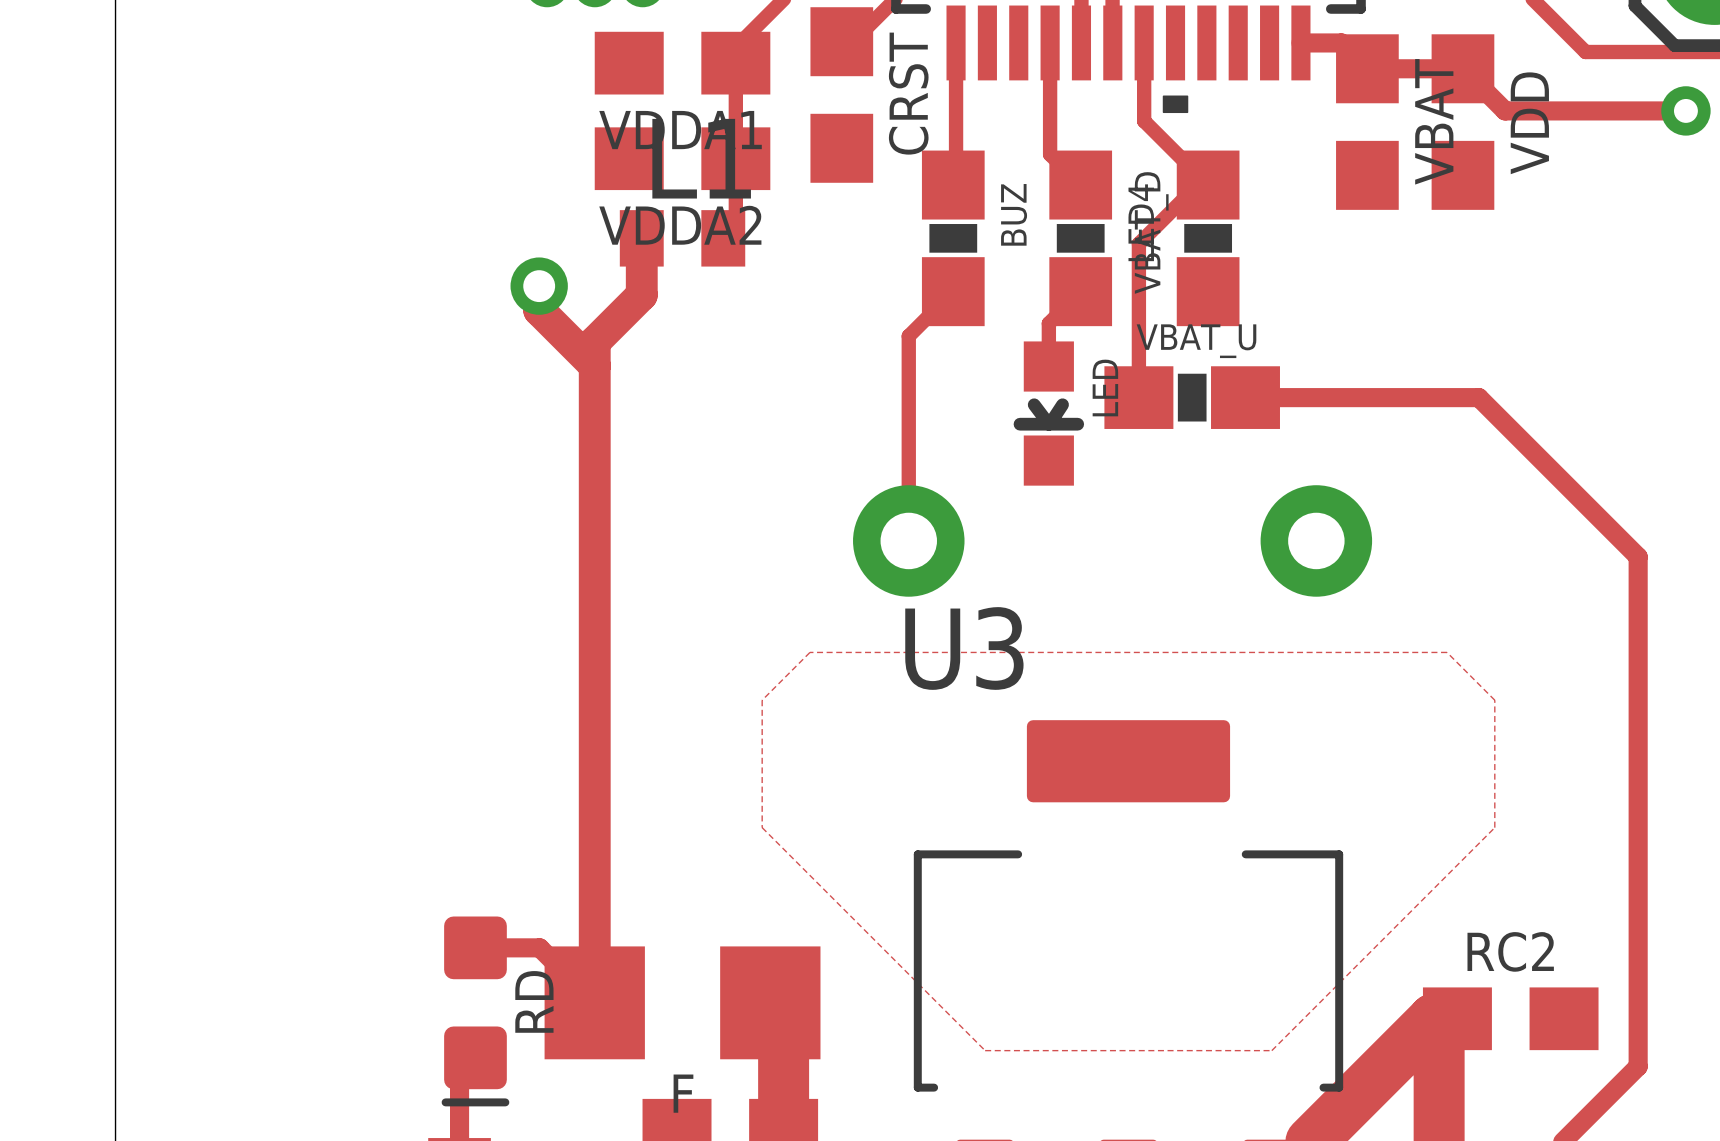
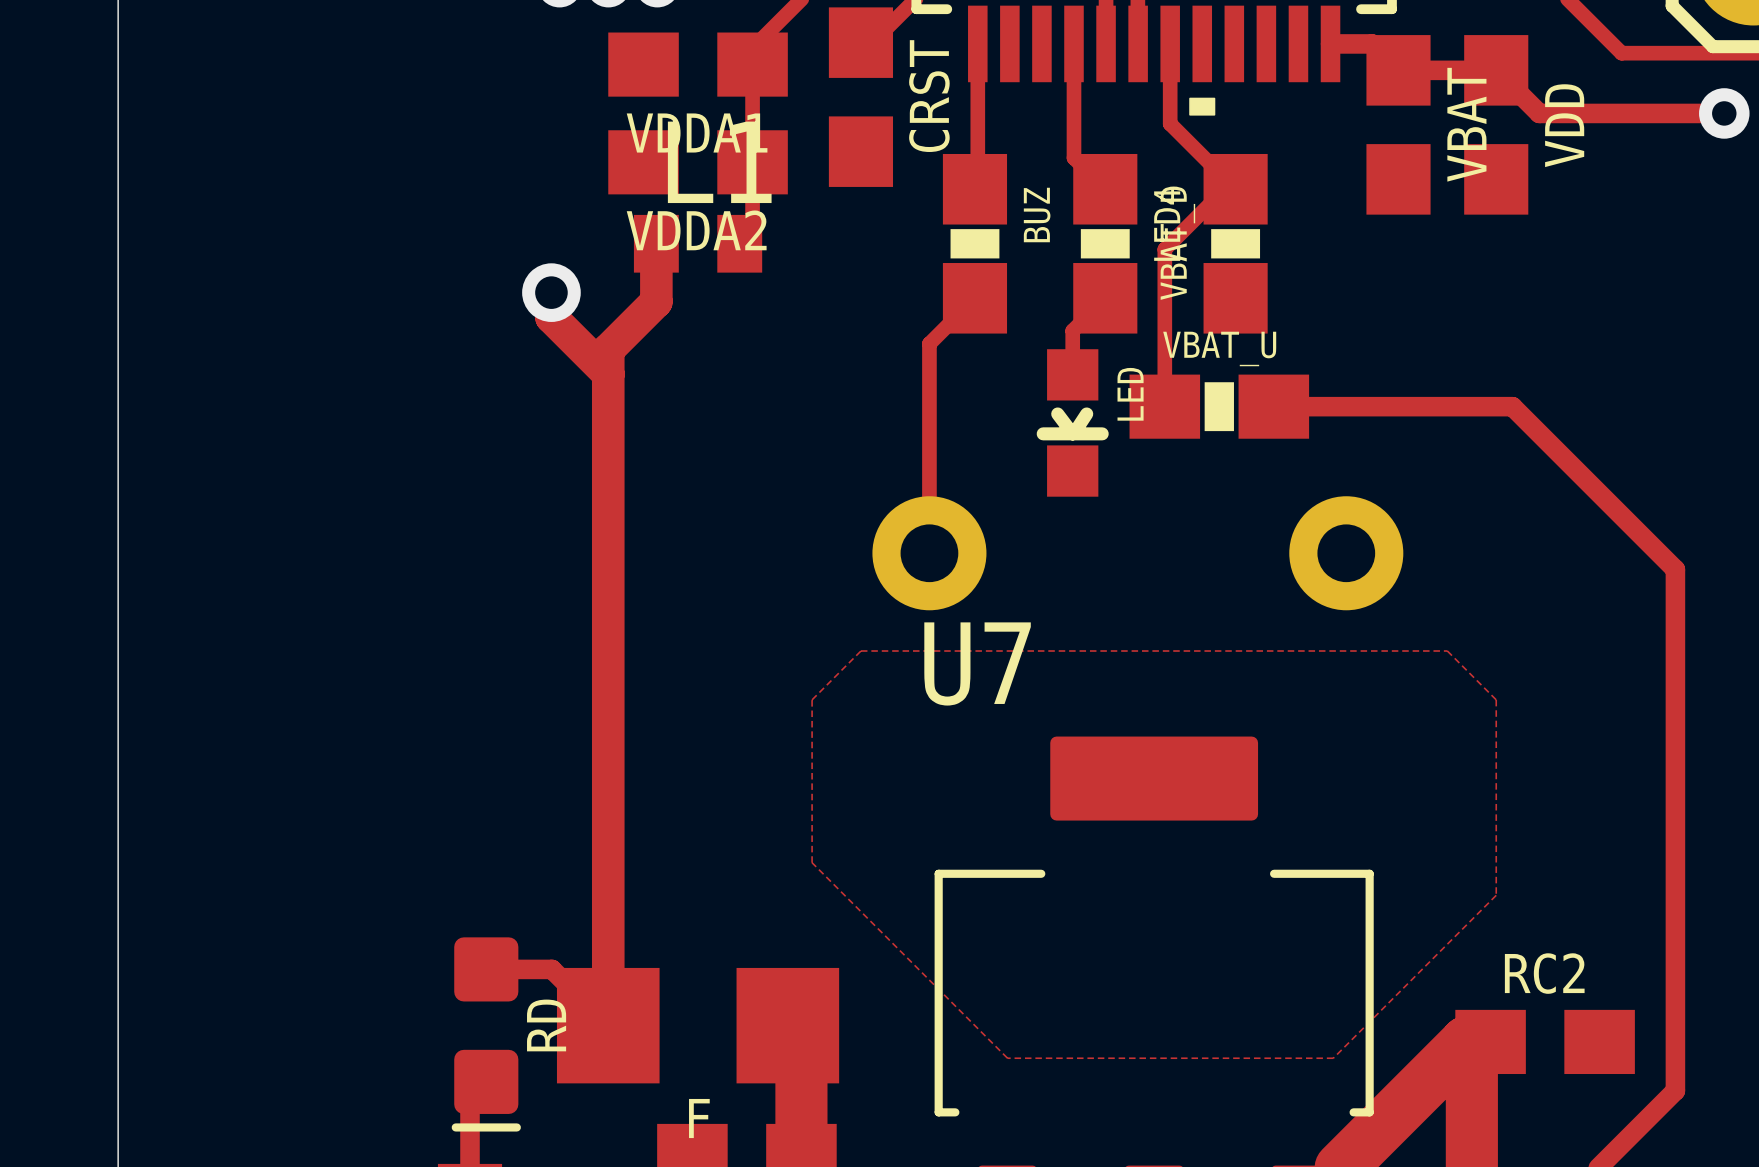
U3 name: U3 (964, 648) -> U7 (977, 663)
zone outline: (809, 652) (1447, 652) (1494, 700) (1494, 827) (1271, 1050) (985, 1050) (762, 827) (762, 700) (809, 652) -> (860, 651) (812, 699) (812, 862) (1007, 1058) (1333, 1058) (1496, 895) (1496, 699) (1447, 651) (860, 651)

